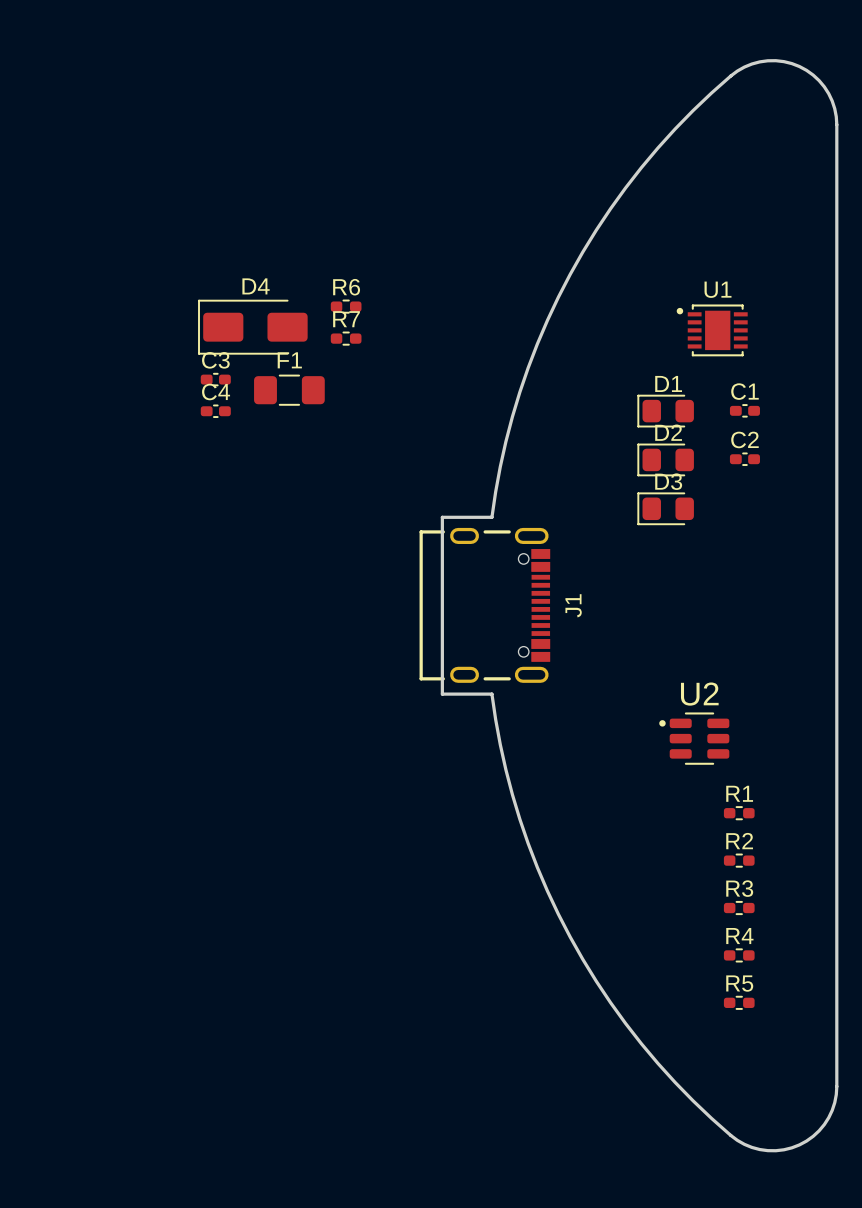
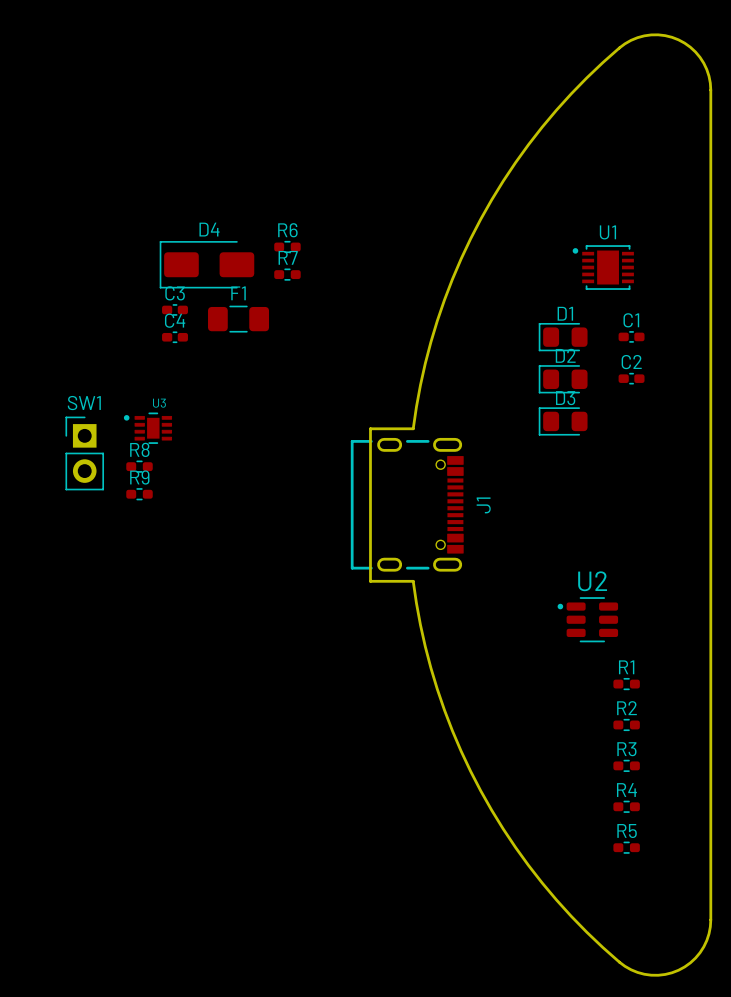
U3: none -> (147, 428)
SW1: none -> (84, 453)
R8: none -> (139, 466)
R9: none -> (139, 494)

